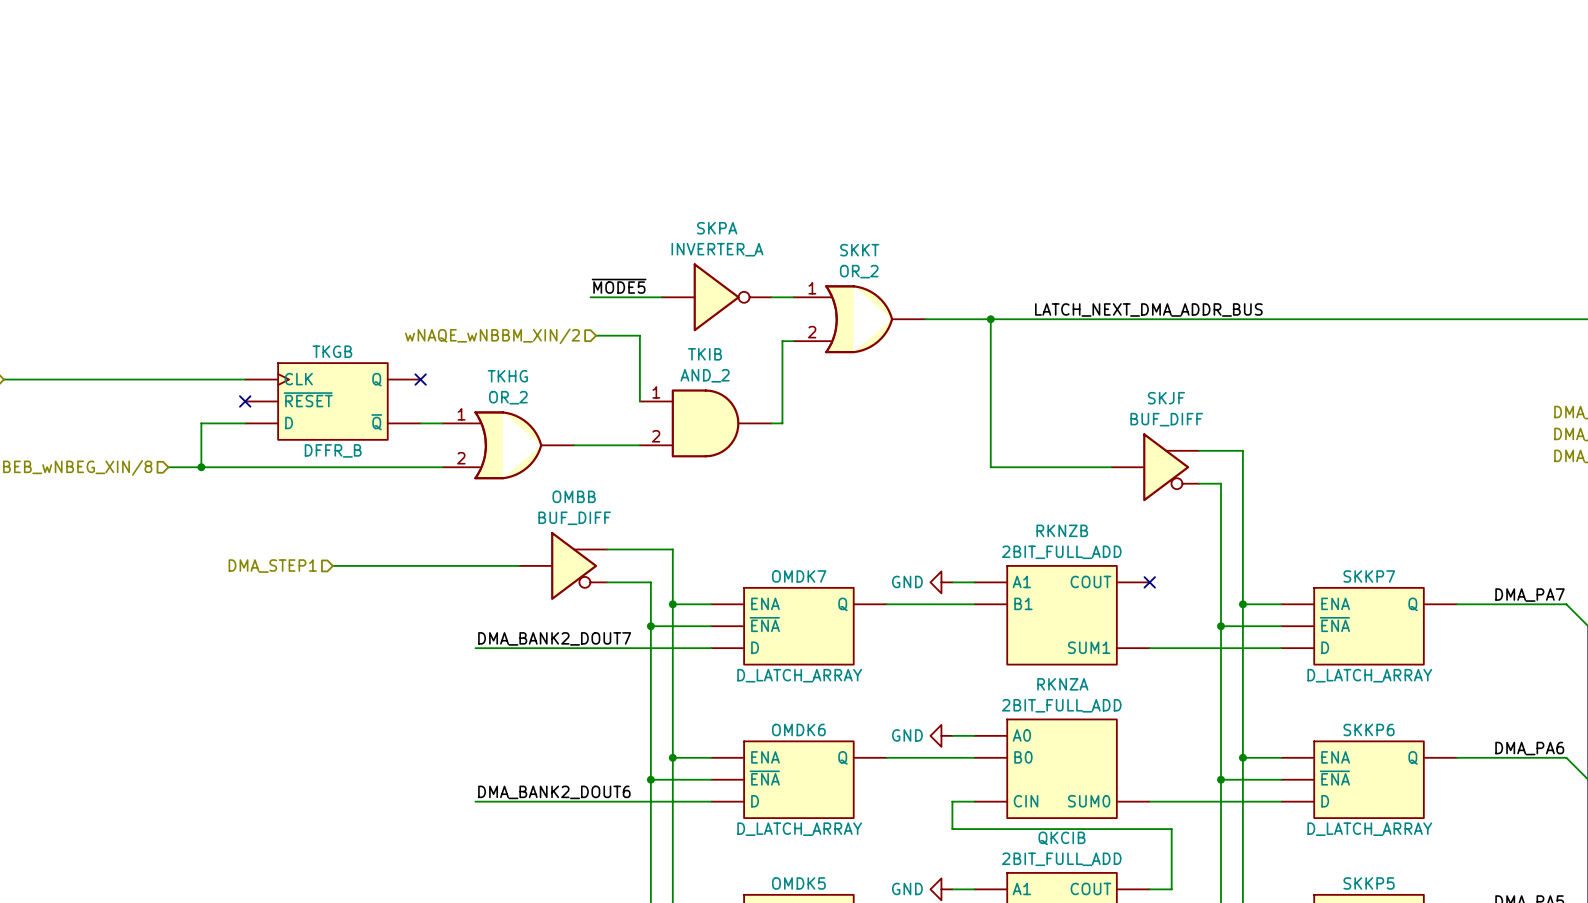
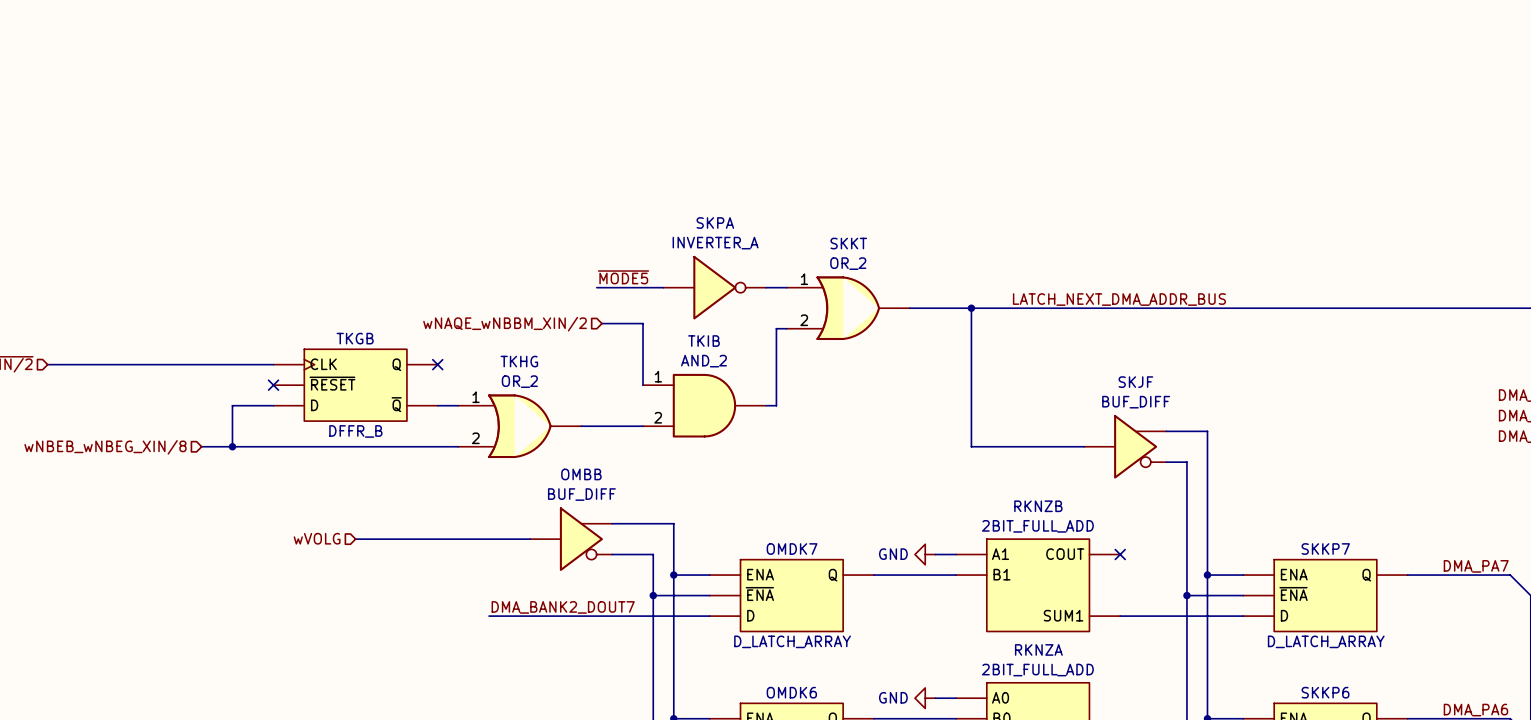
hierarchical label: DMA_STEP1 (272, 566) -> wVOLG (317, 538)

